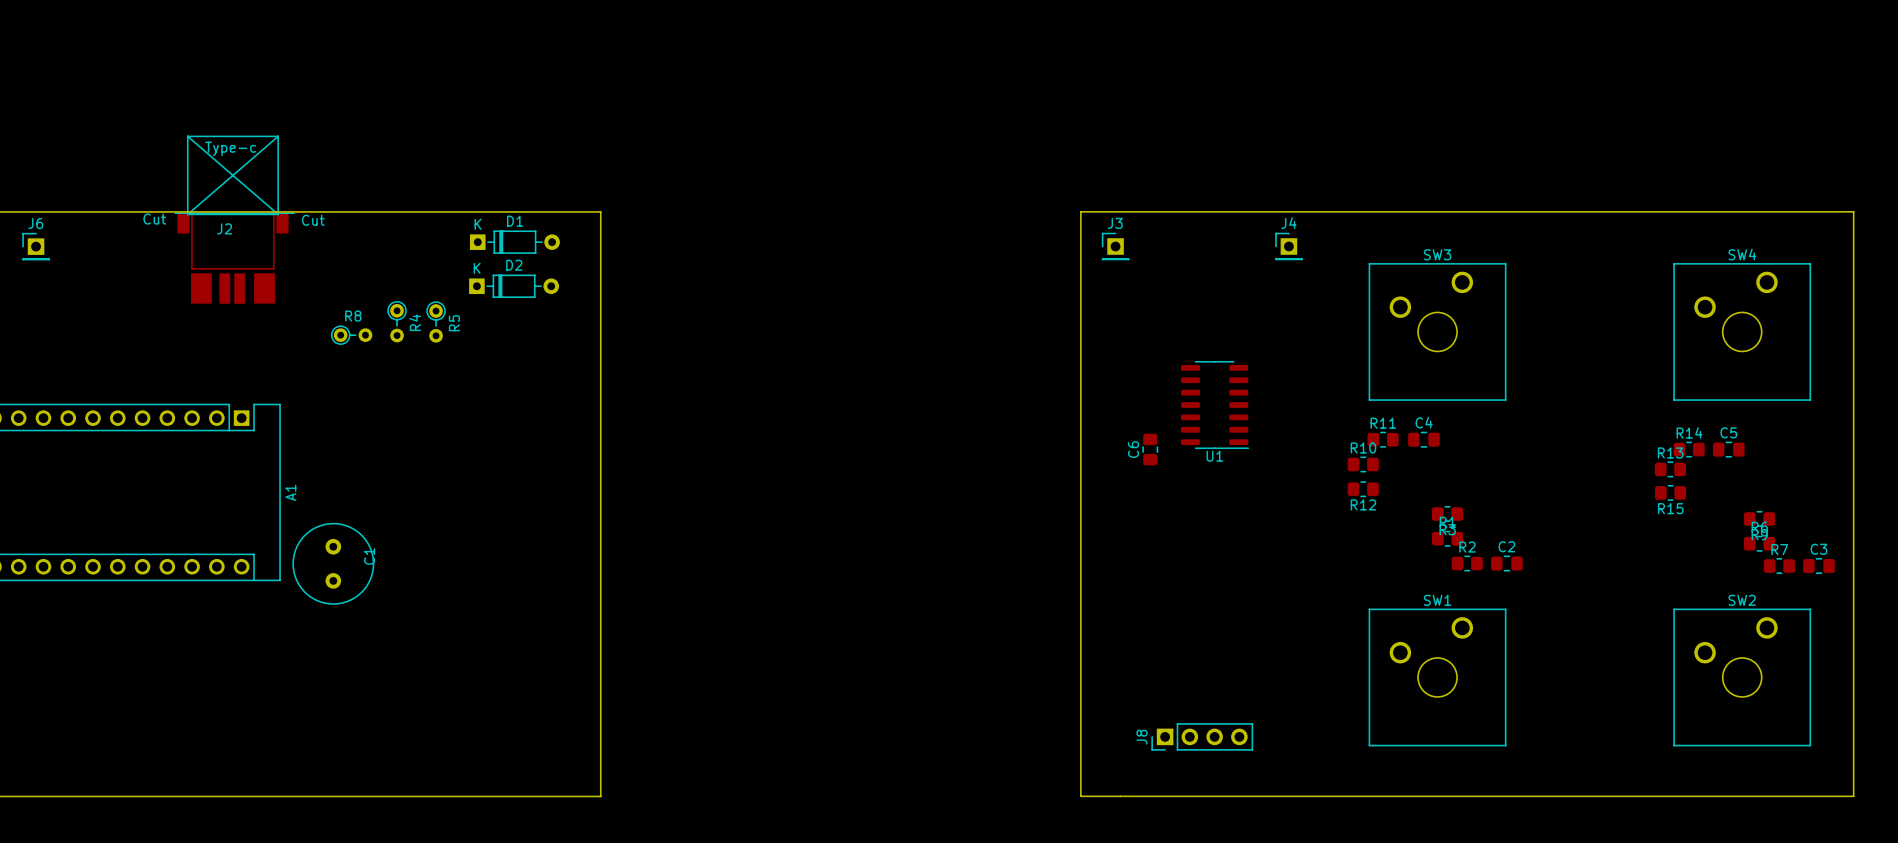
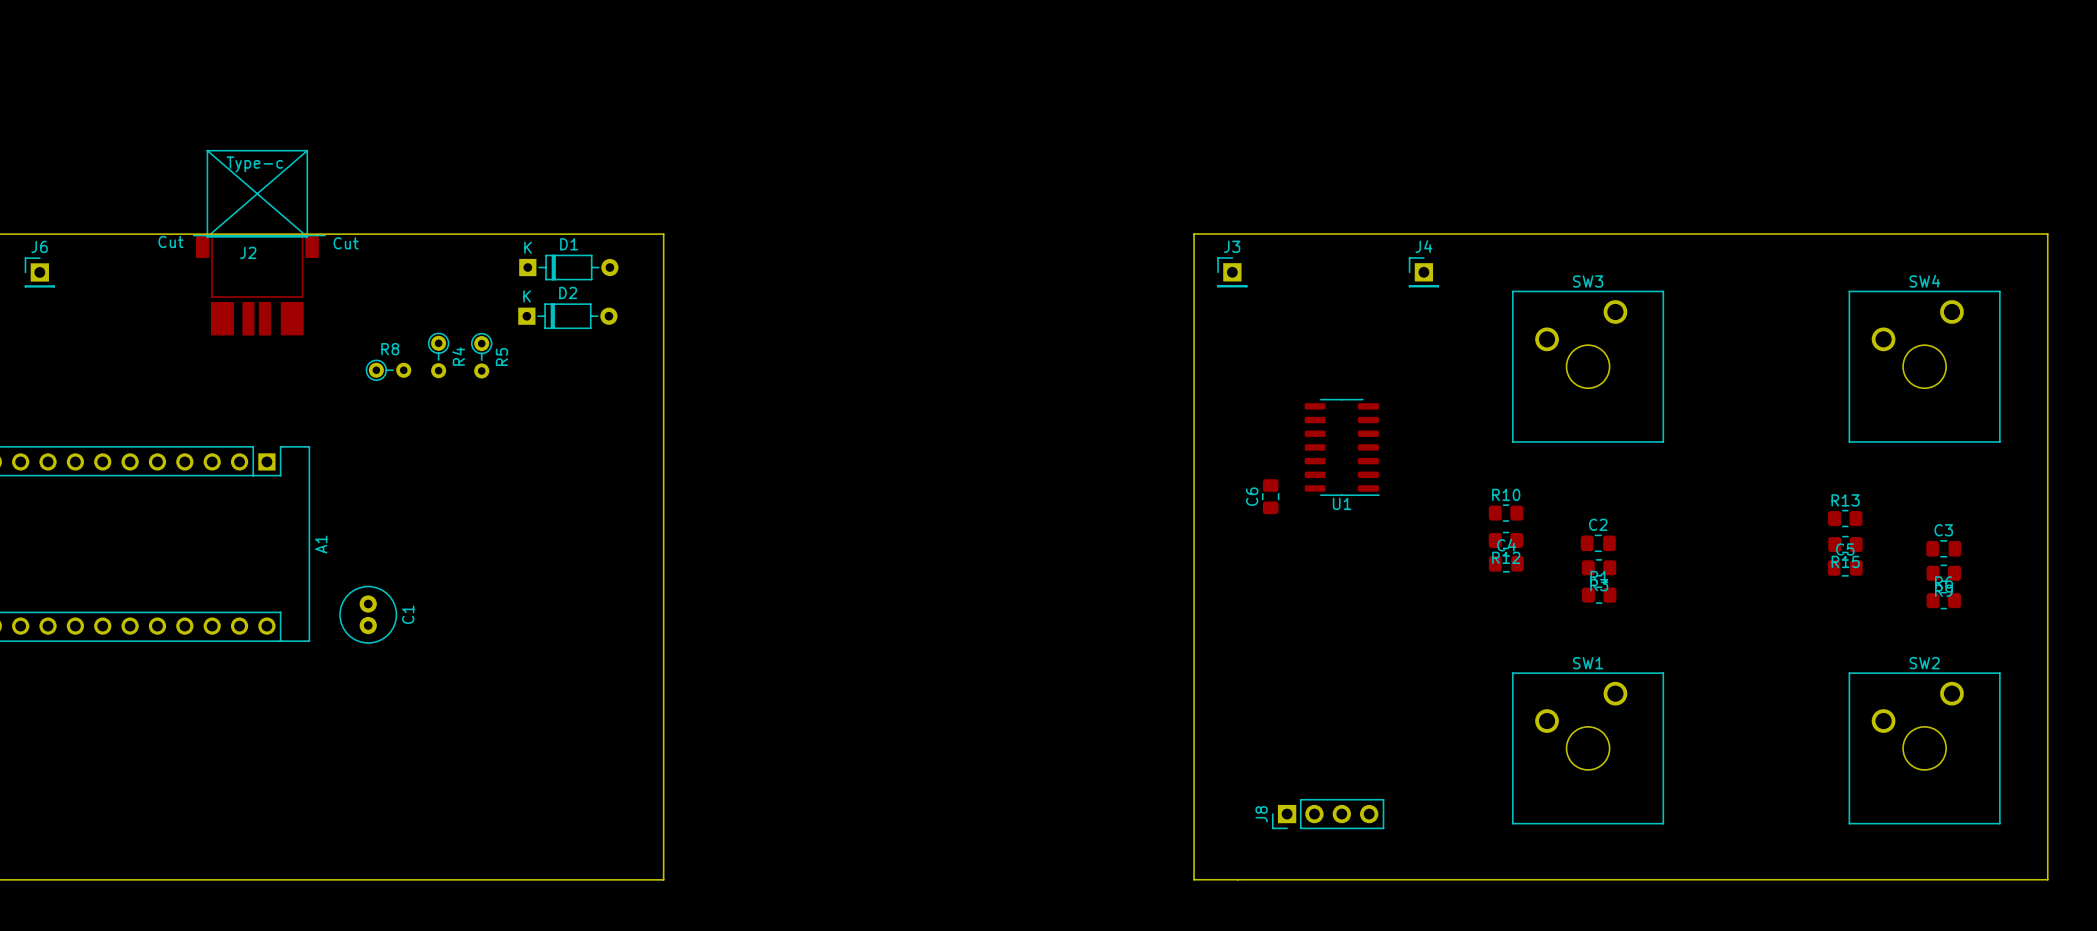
R11: (1383, 439) -> none
C4 position: (1423, 439) -> (1506, 563)
R14: (1689, 449) -> none
C5 position: (1728, 449) -> (1845, 567)
C1 footprint: [292, 523, 375, 605] -> [339, 585, 398, 644]
R2: (1467, 563) -> none
C2 position: (1506, 563) -> (1598, 543)
R7: (1779, 566) -> none
C3 position: (1818, 566) -> (1943, 548)

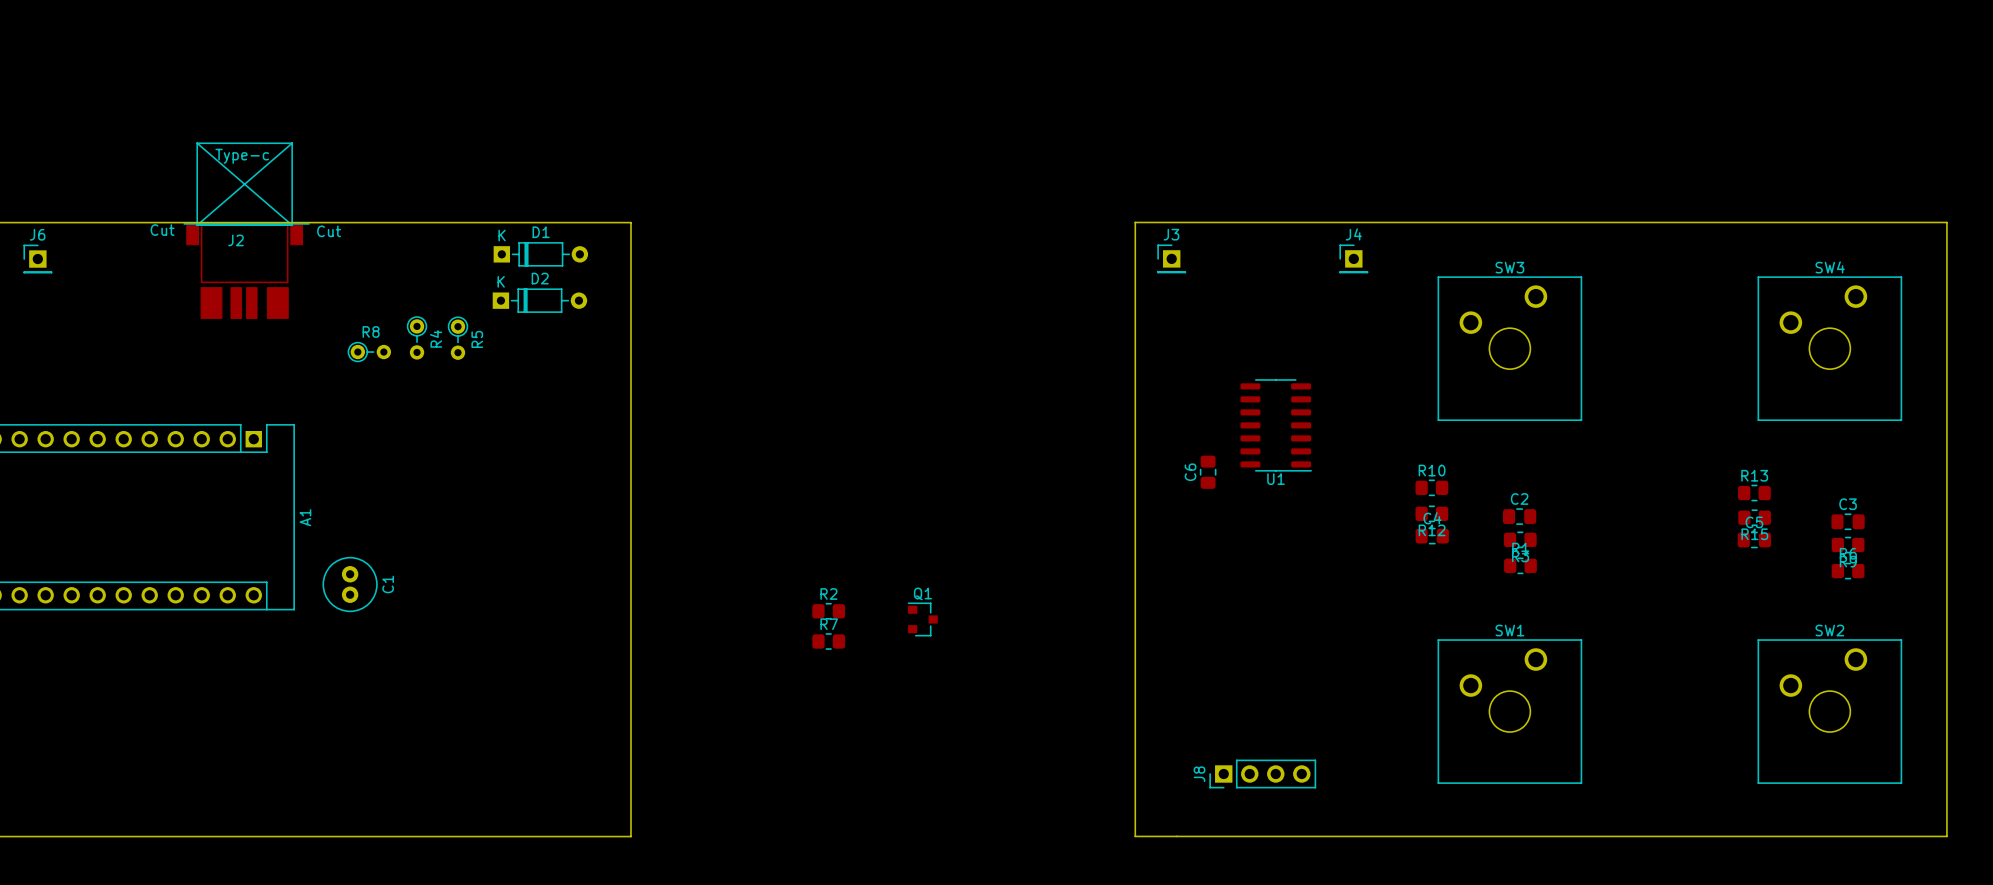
R2: none -> (828, 611)
Q1: none -> (922, 619)
R7: none -> (828, 641)

